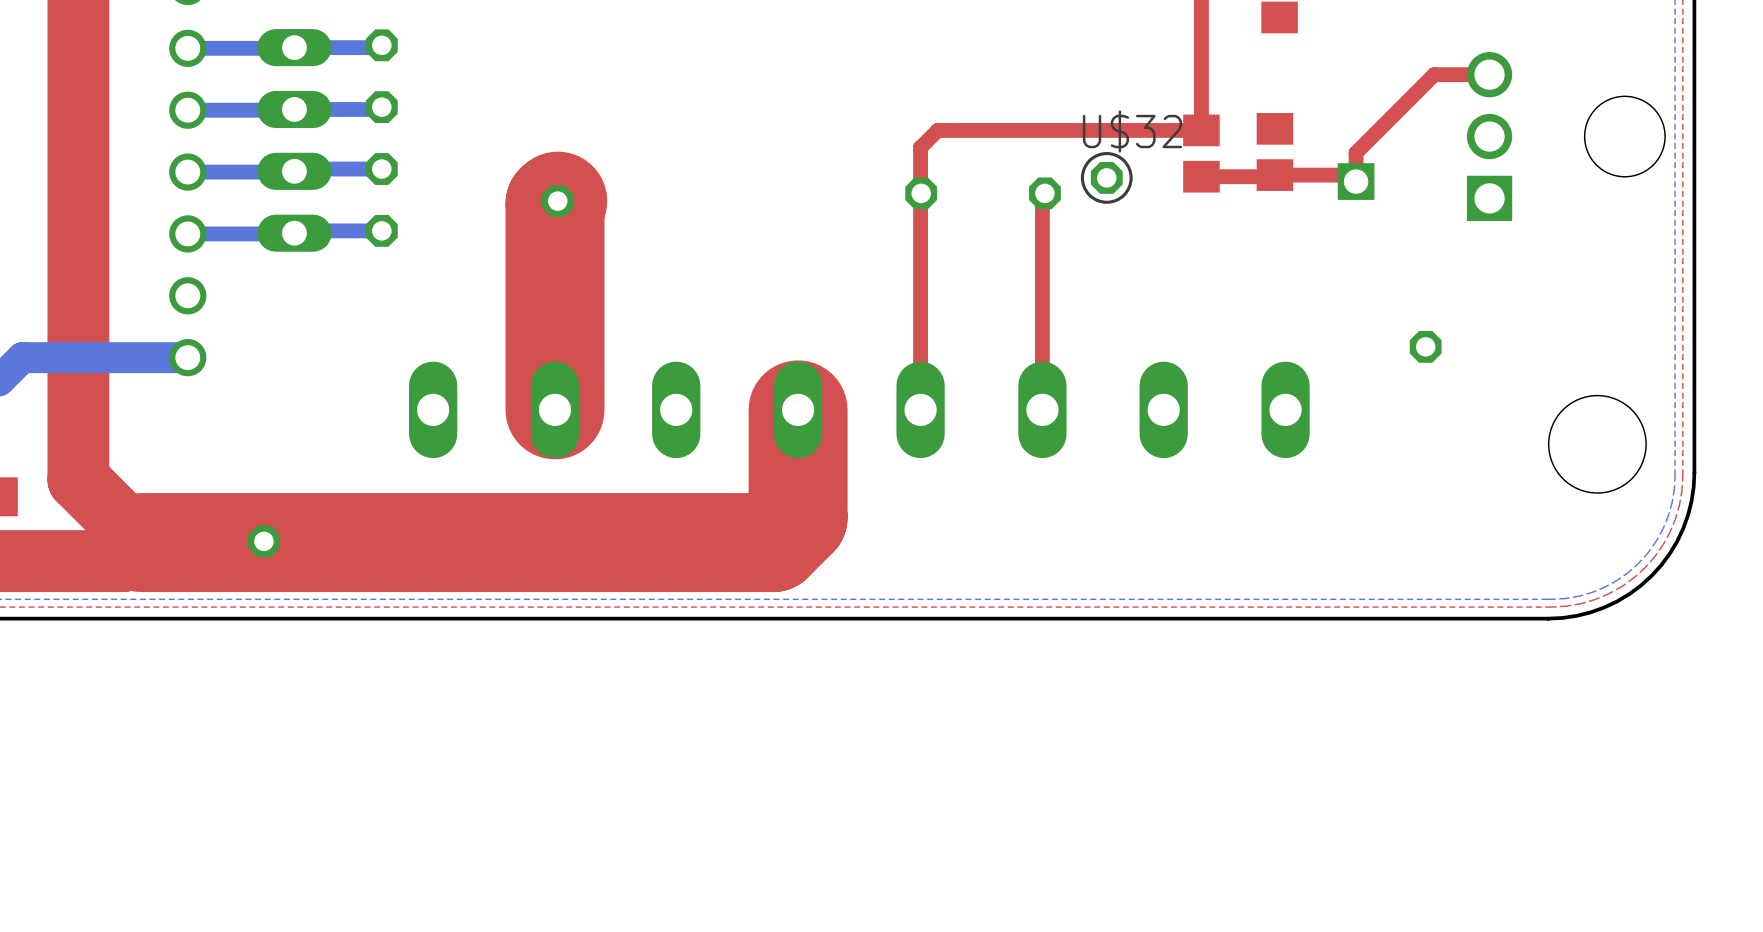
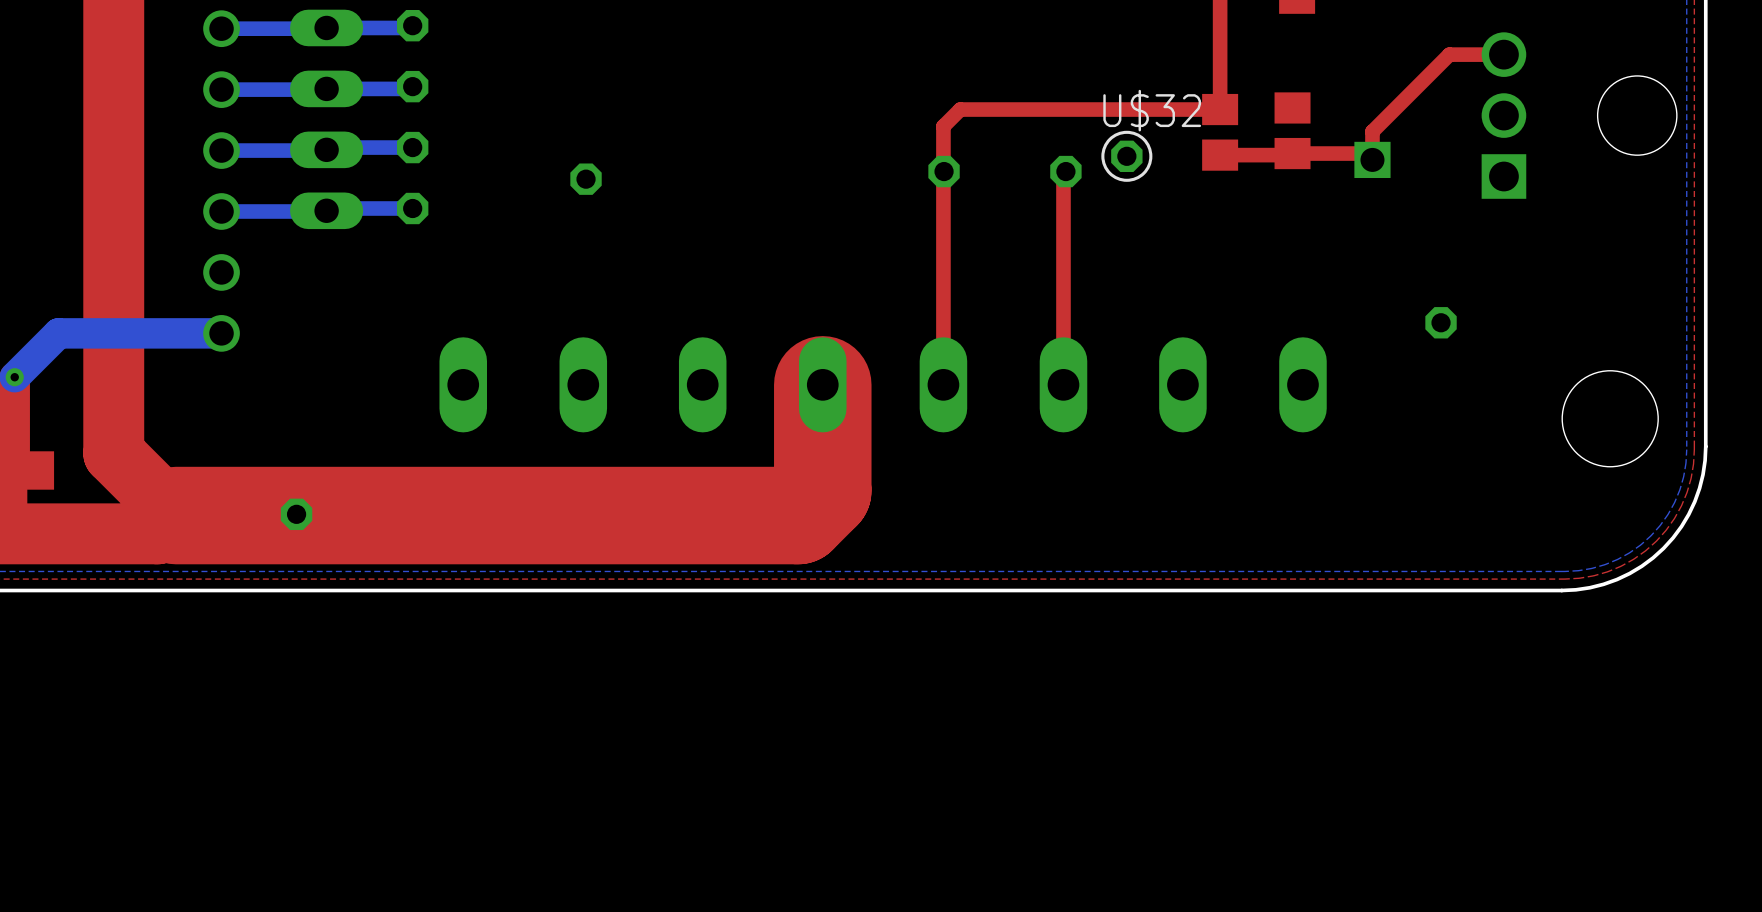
top track: (557, 201) (555, 203) (555, 409) -> none

